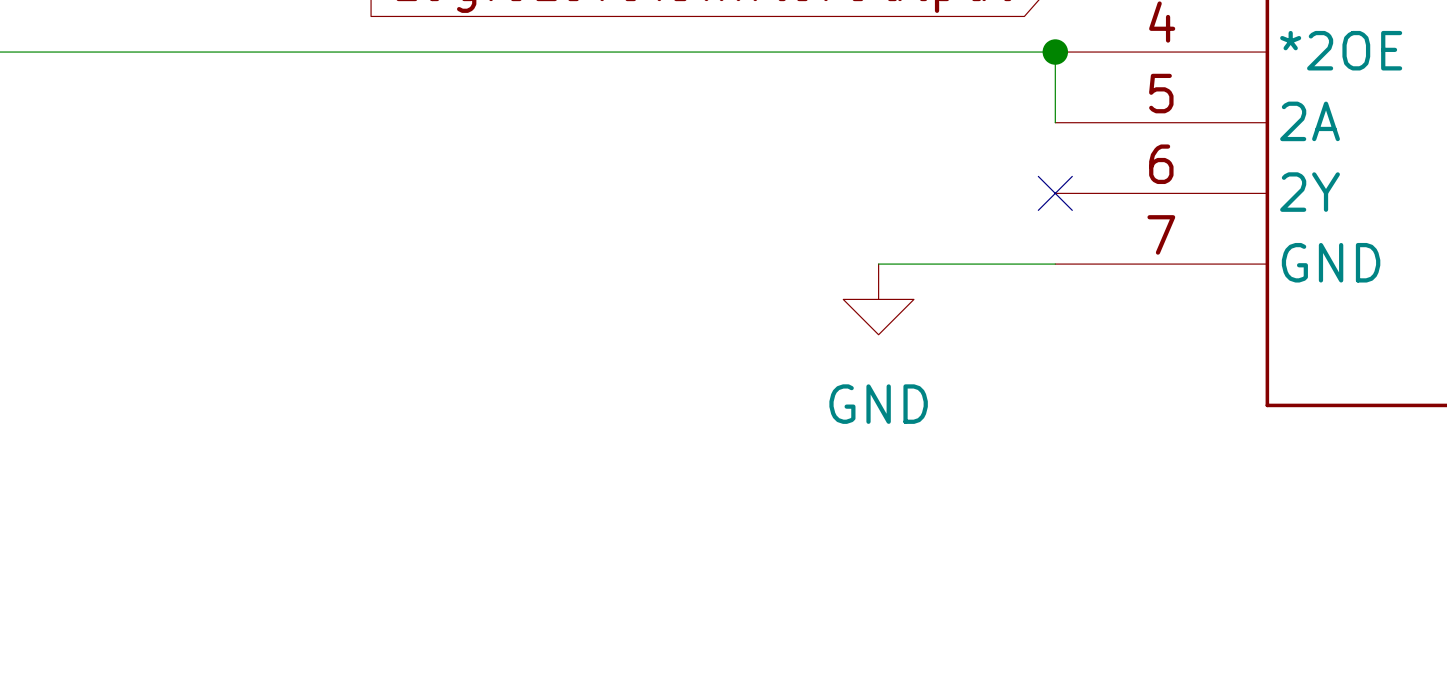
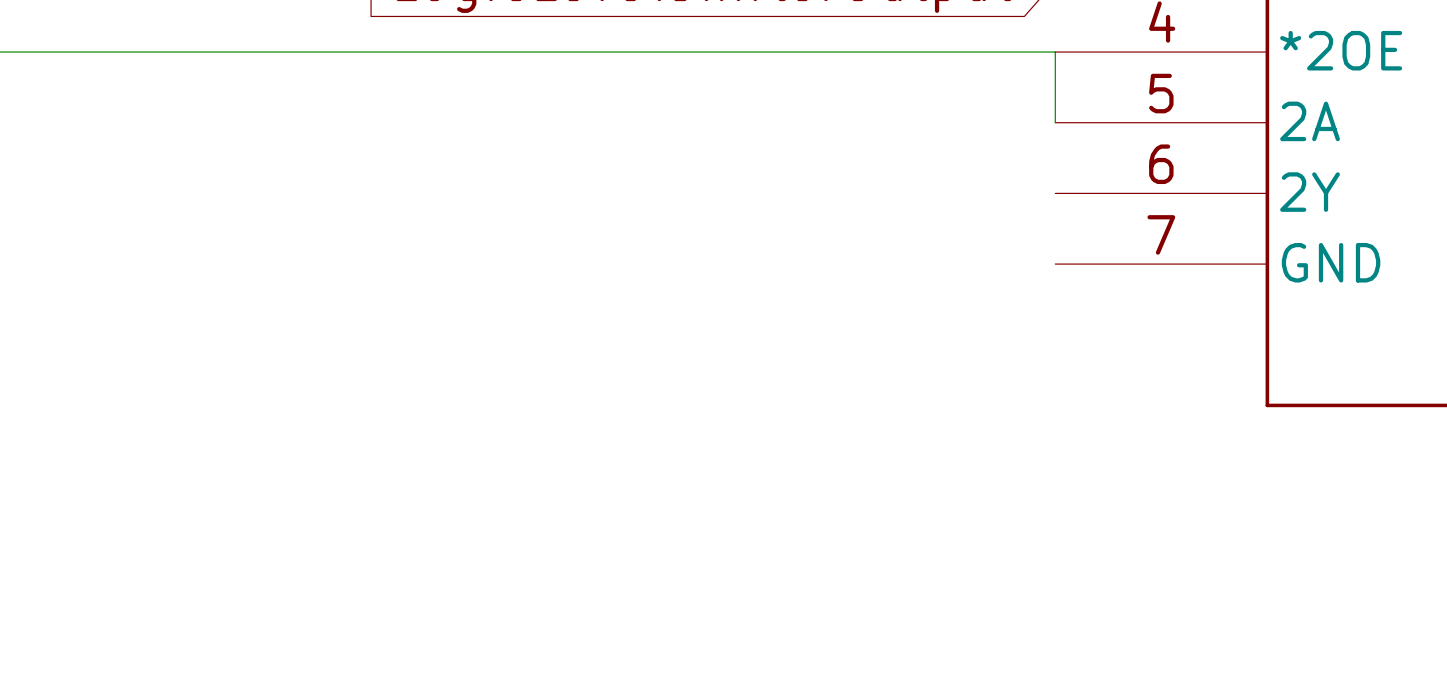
junction: (1055, 52) -> none
no-connect mark: (1055, 193) -> none
wire: (878, 264) (1055, 264) -> none
power symbol: GND (878, 299) -> none

